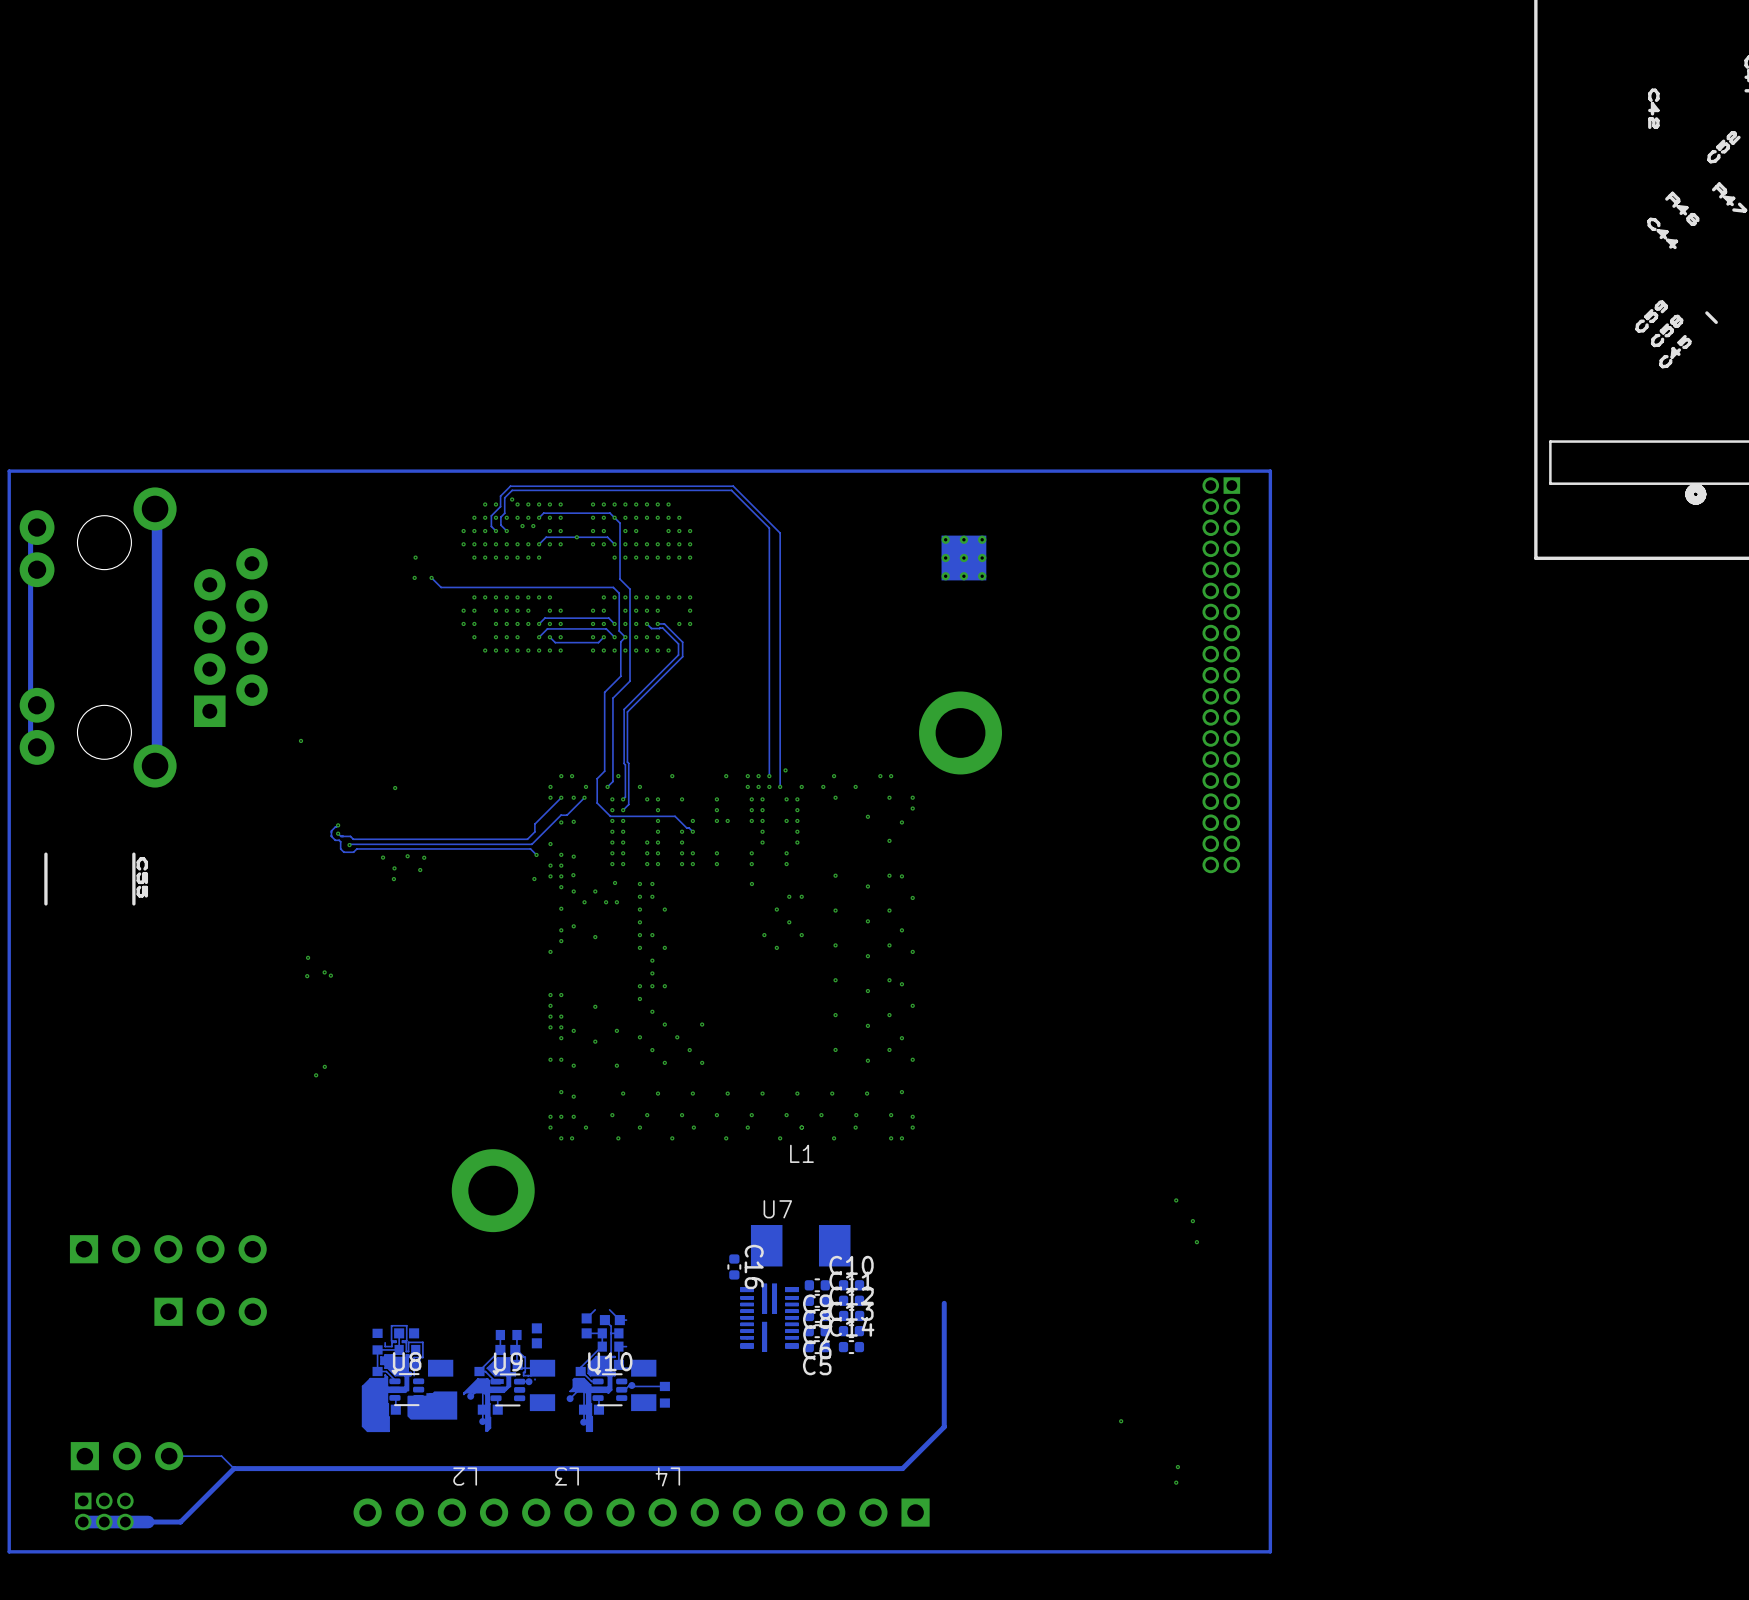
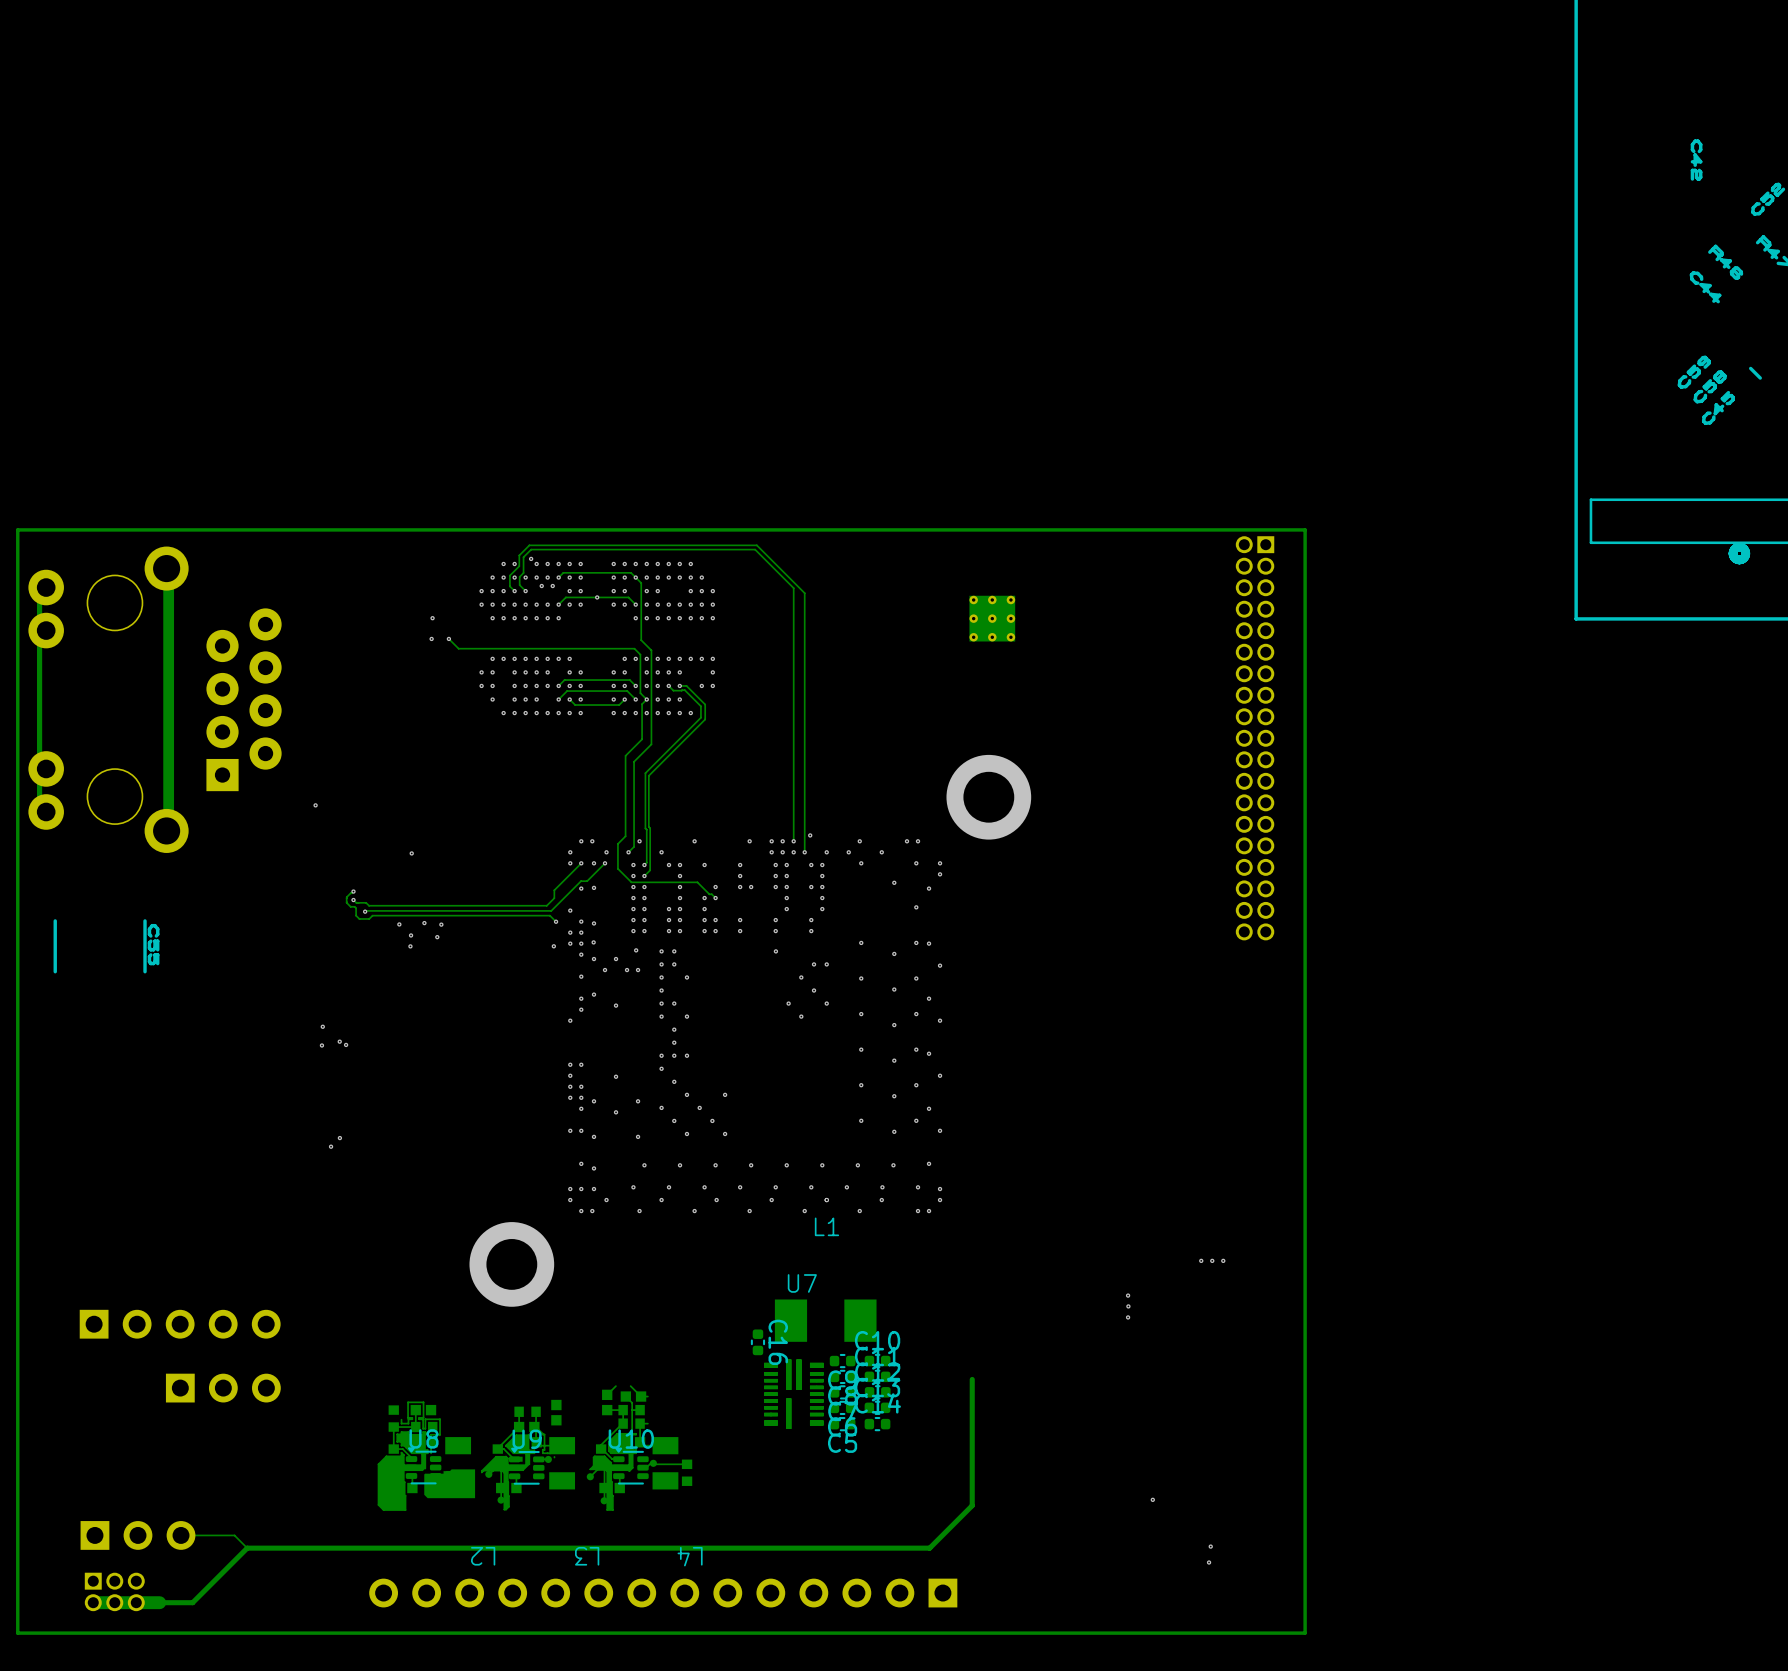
via: none -> (1201, 1260)
via: none -> (1212, 1260)
via: none -> (1223, 1260)
via: (1176, 1200) -> none
via: none -> (1128, 1295)
via: (1192, 1221) -> none
via: none -> (1128, 1306)
via: none -> (1128, 1317)
via: (1196, 1242) -> none

